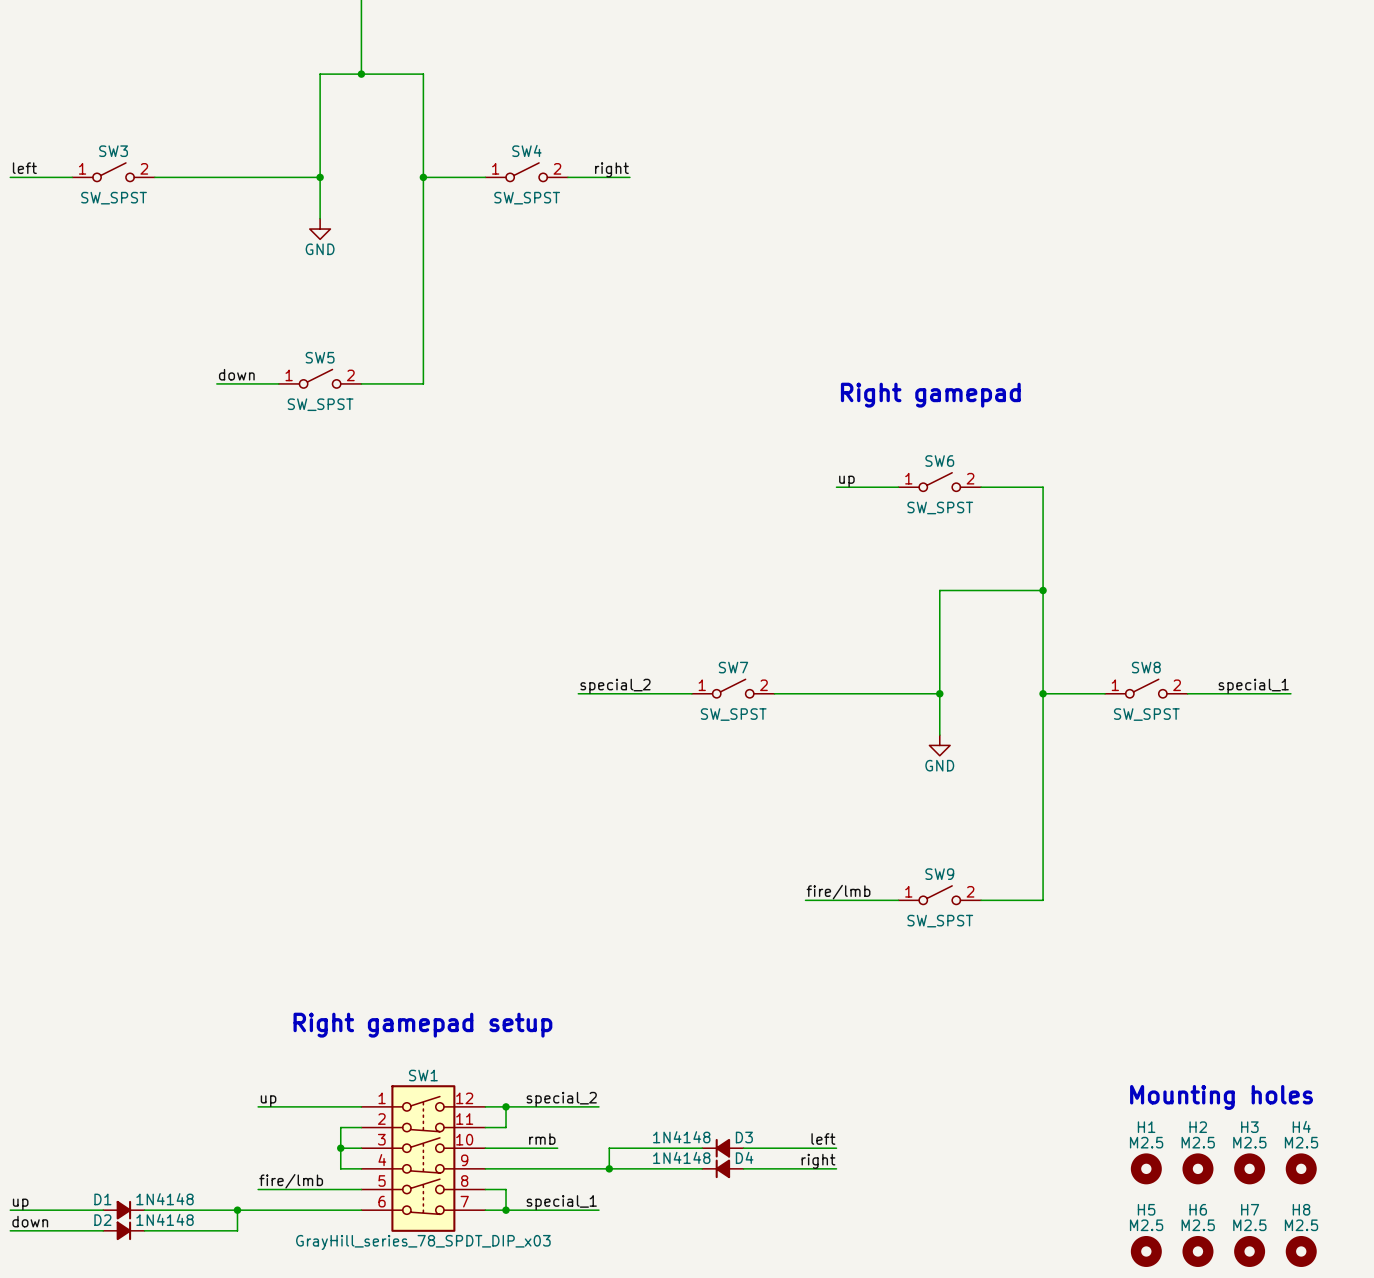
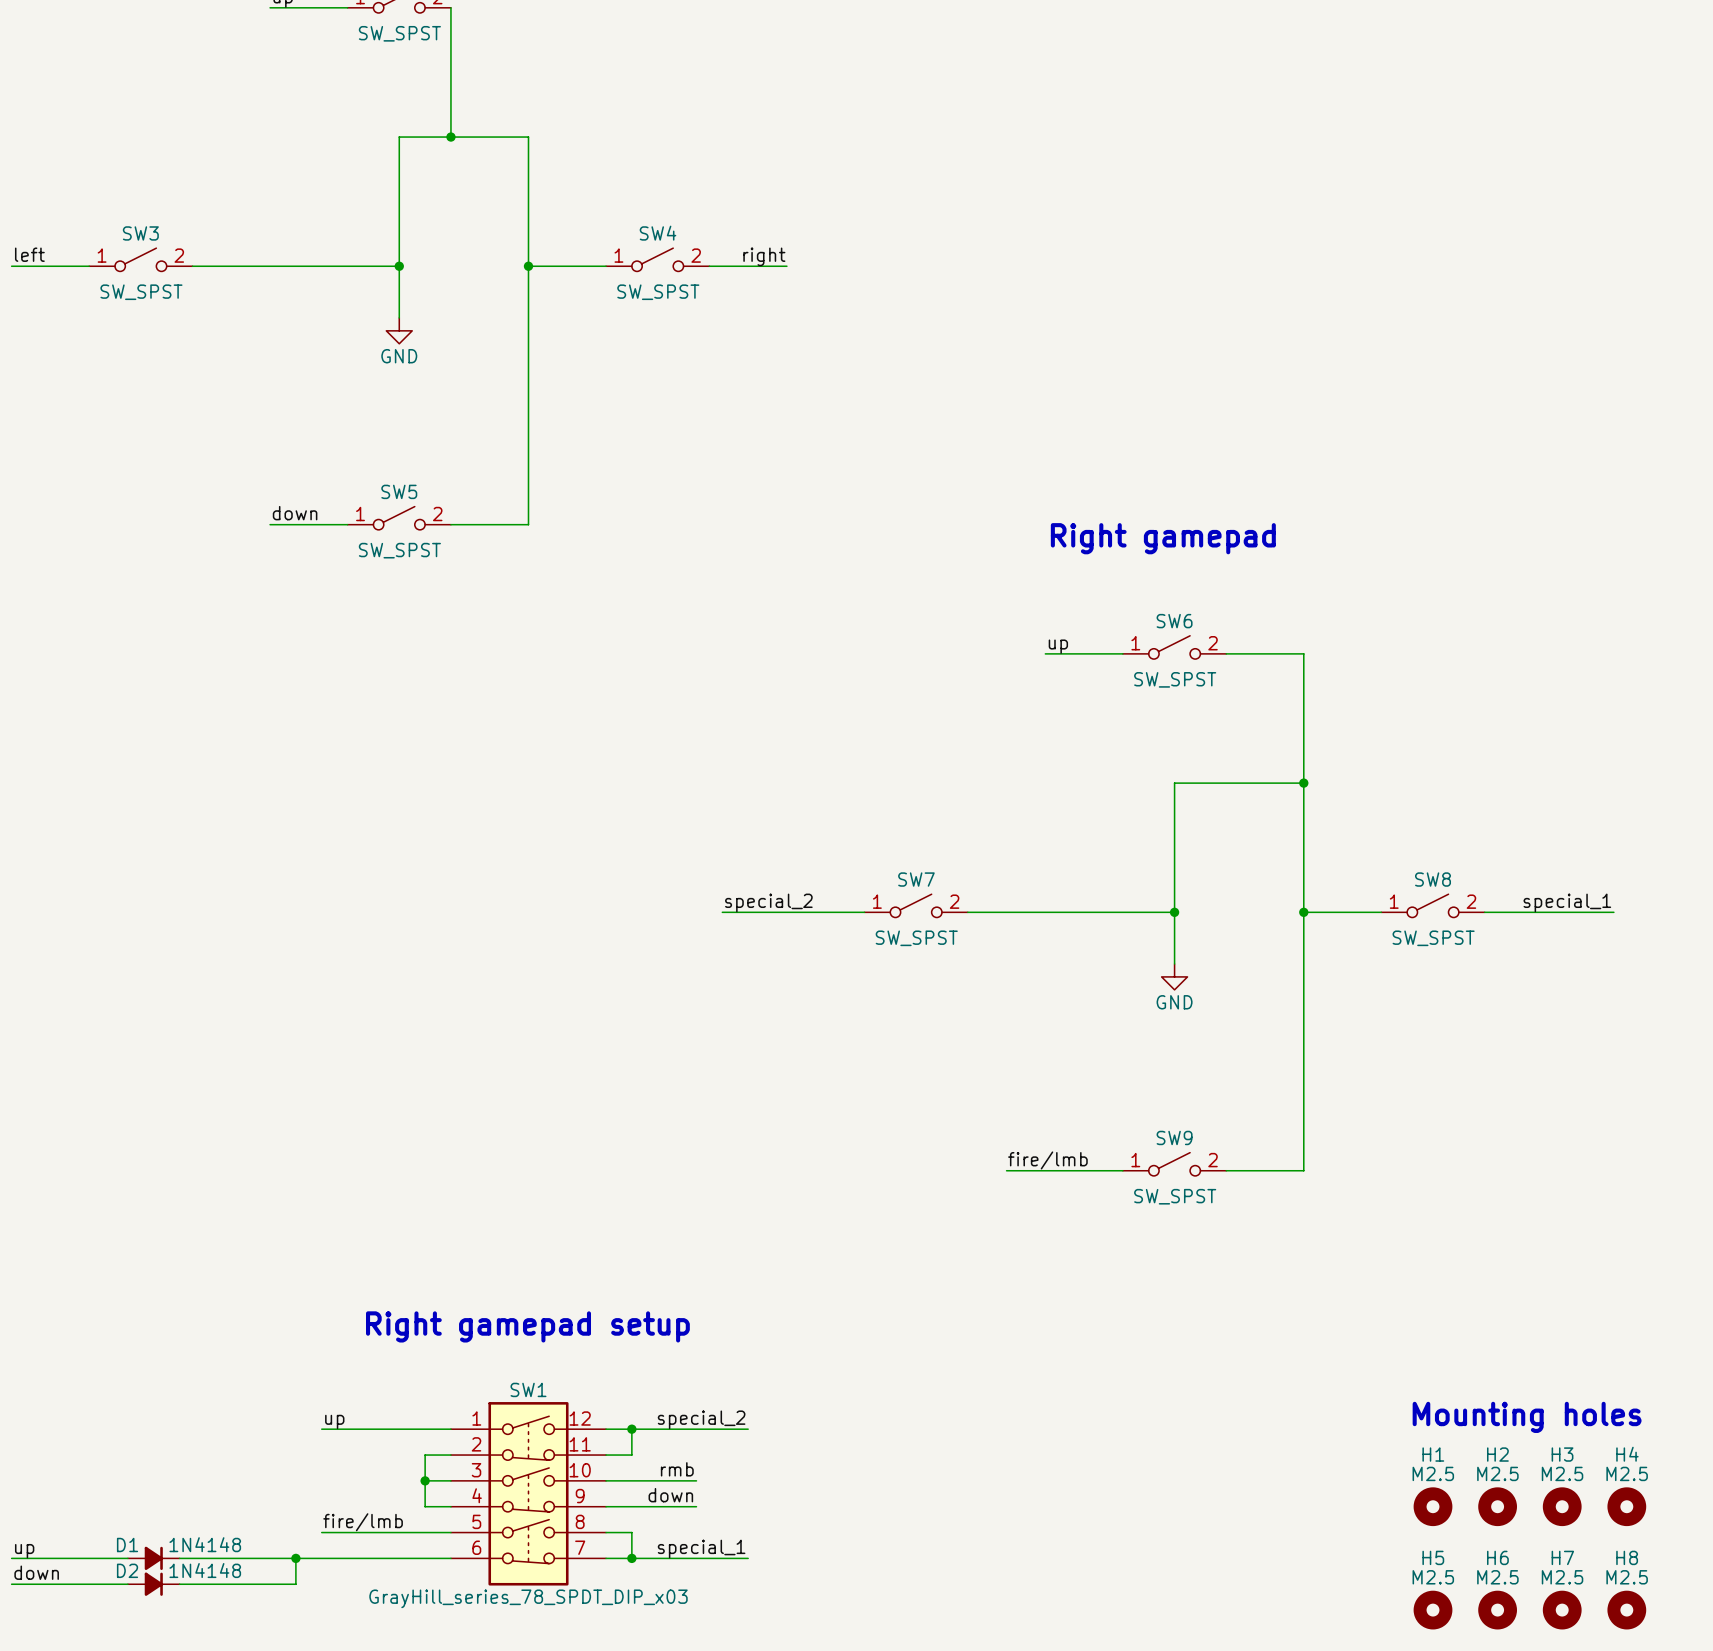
label: left (823, 1138) -> none
wire: (702, 1148) (609, 1148) (609, 1168) -> none
D3: 1N4148 (722, 1148) -> none
wire: (743, 1148) (836, 1148) -> none
label: none -> down (670, 1495)
label: right (818, 1161) -> none
wire: (557, 1168) (702, 1168) -> none
junction: (609, 1168) -> none
D4: 1N4148 (722, 1168) -> none
wire: (743, 1168) (836, 1168) -> none

